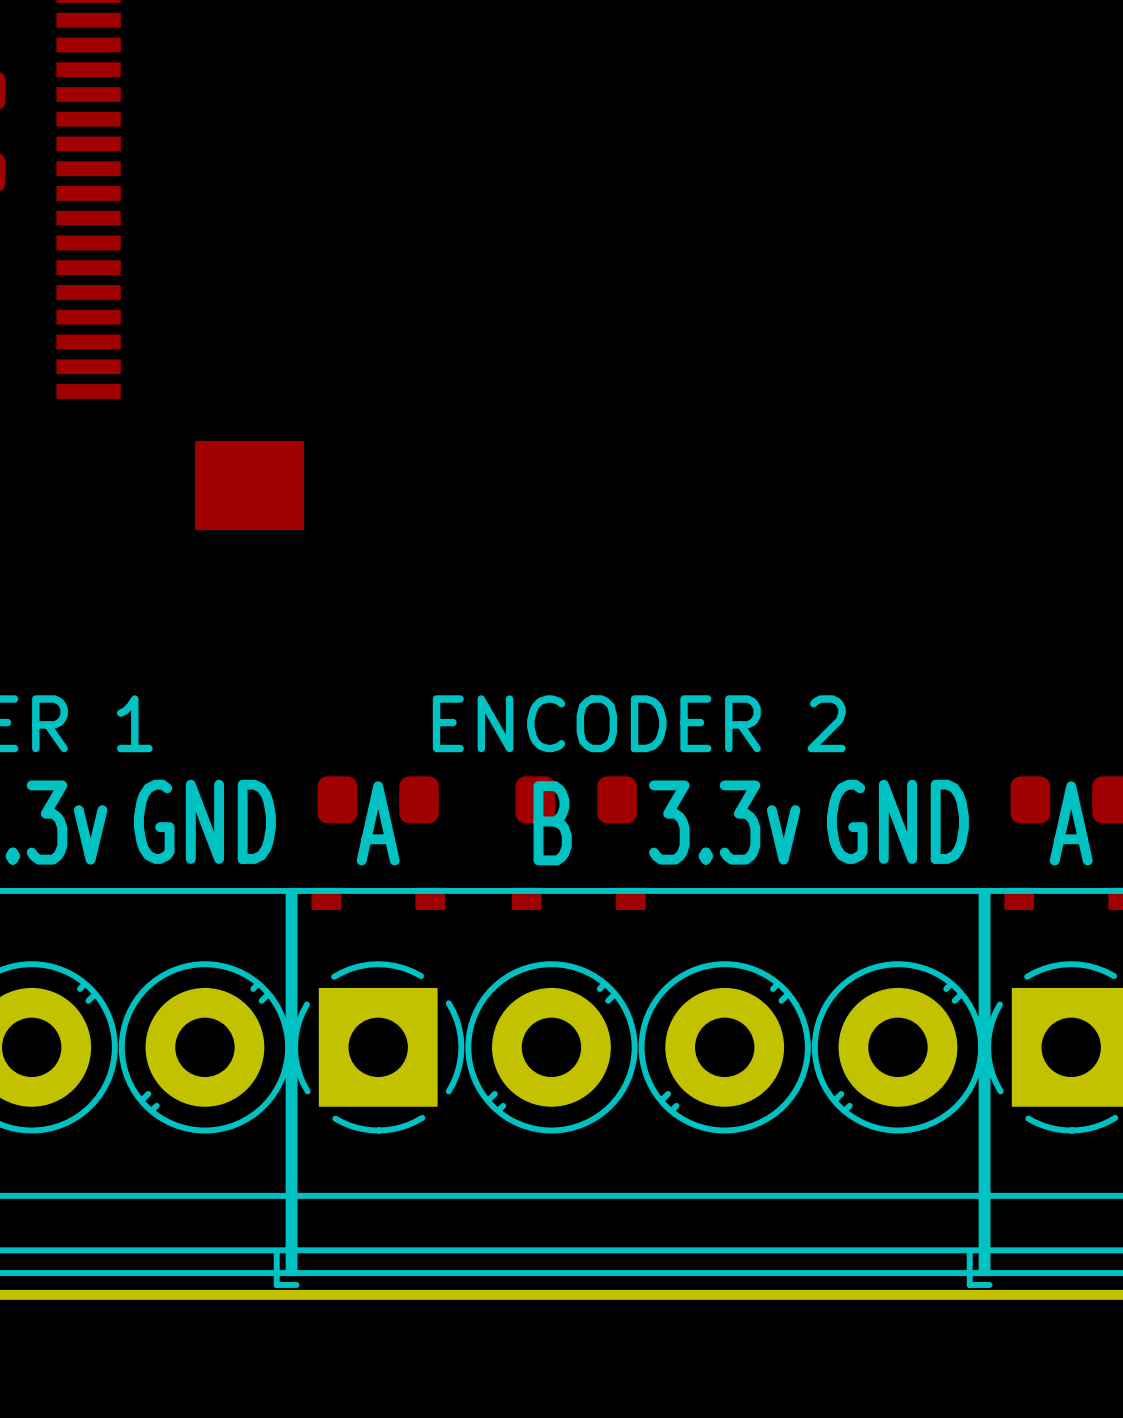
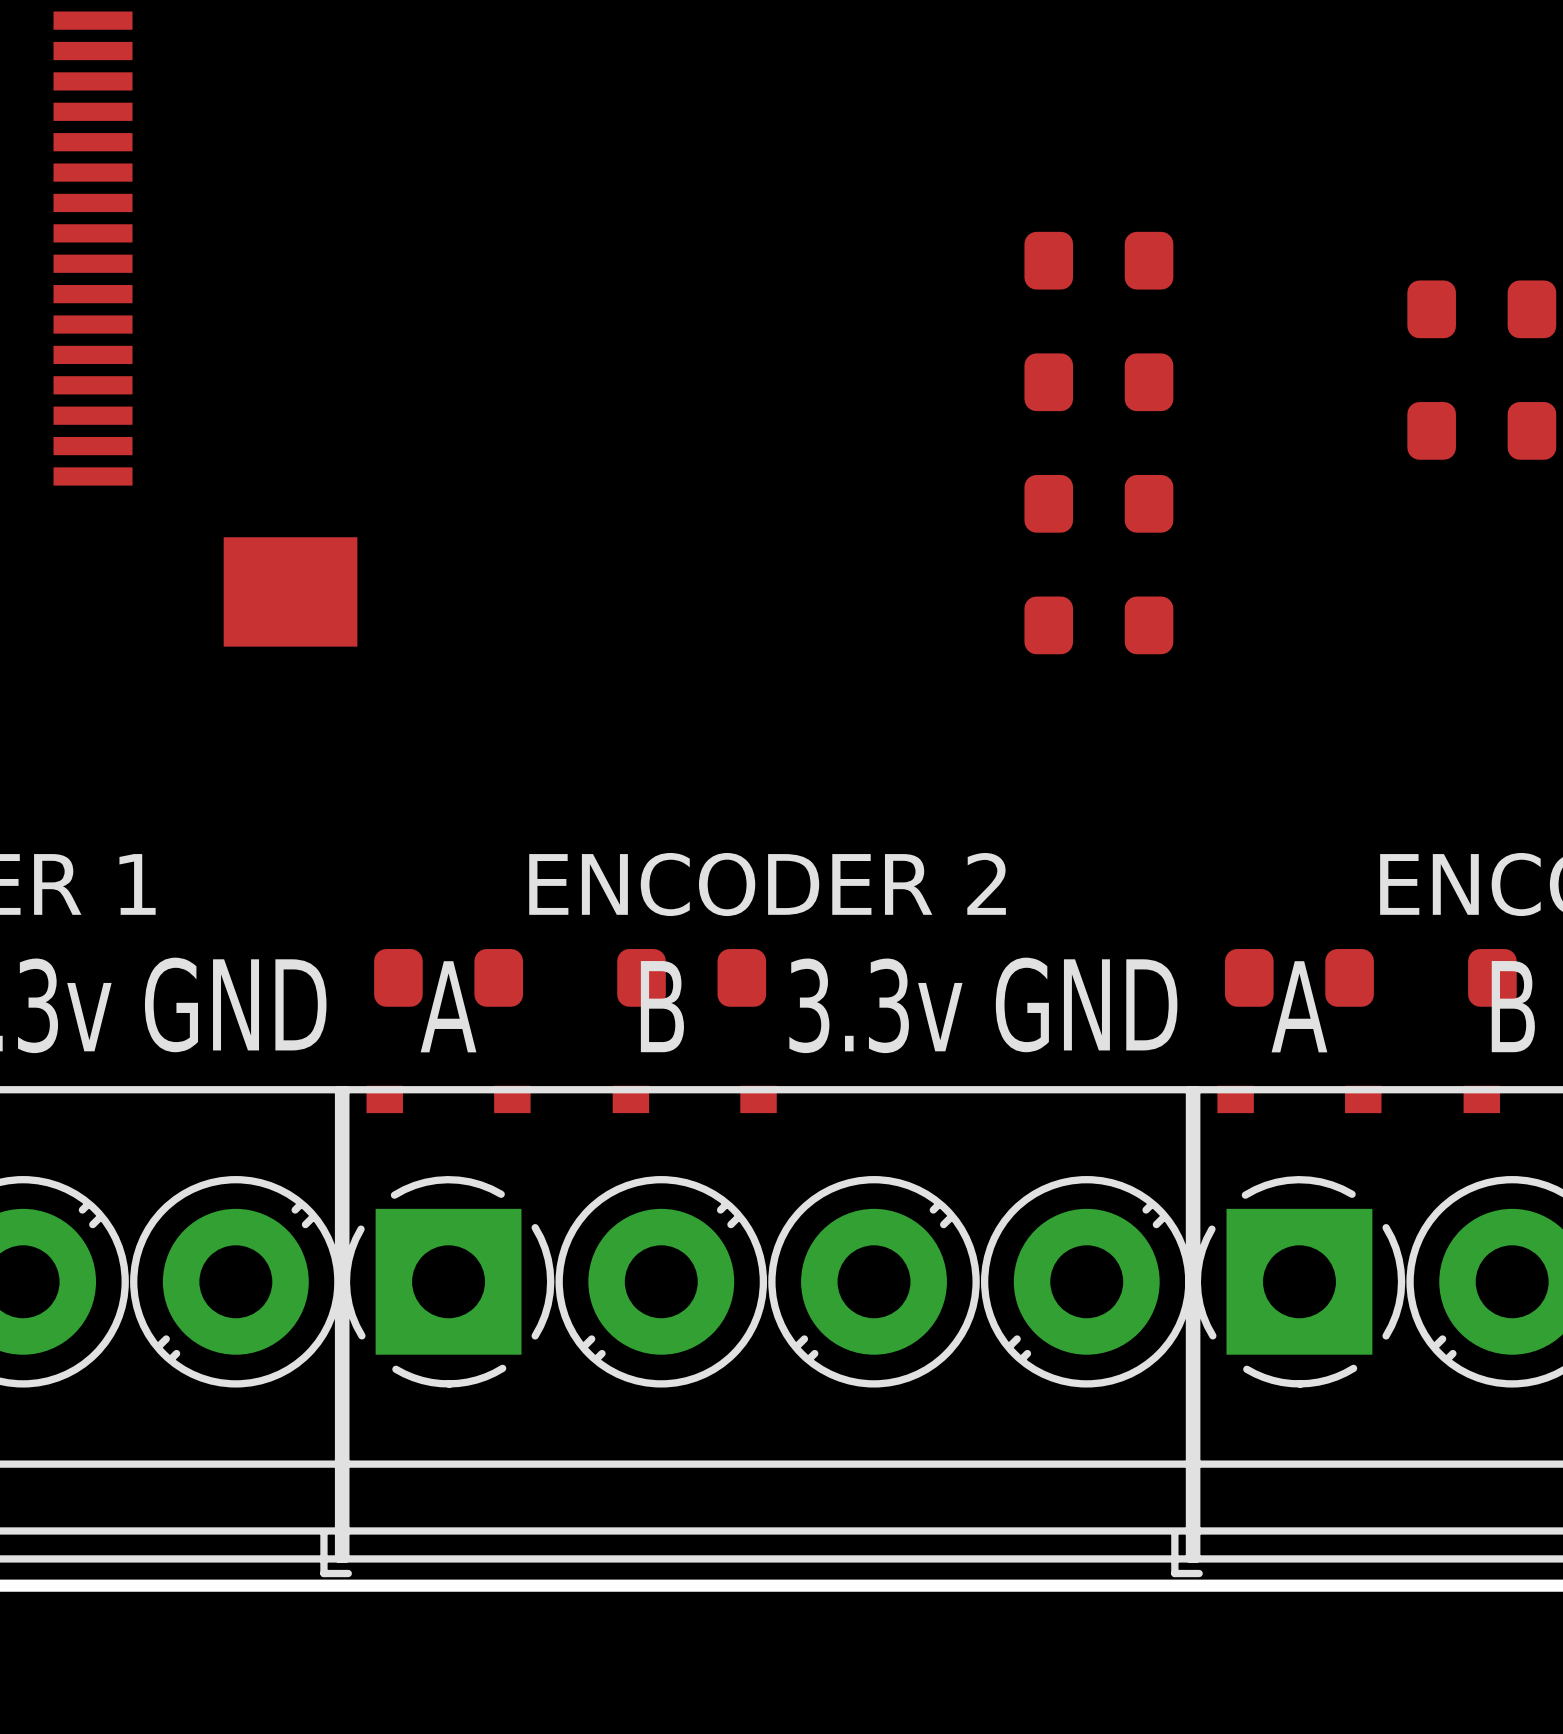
part: none -> (1098, 260)
part: none -> (1098, 382)
part: none -> (1098, 503)
part: none -> (1098, 625)

